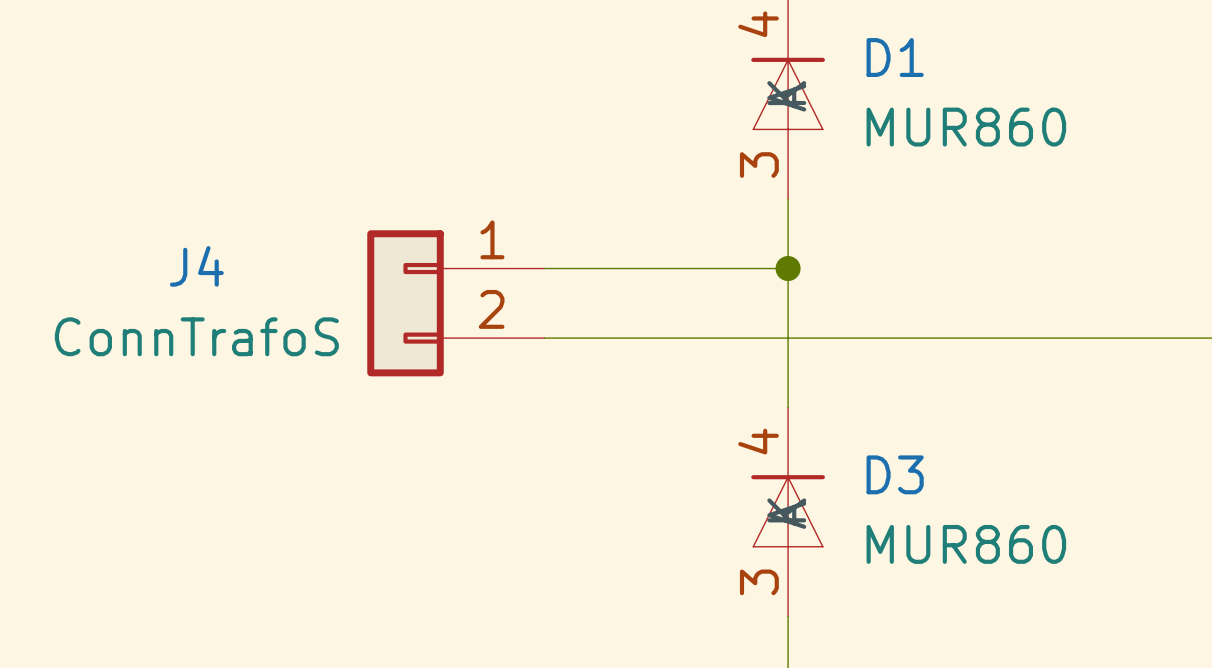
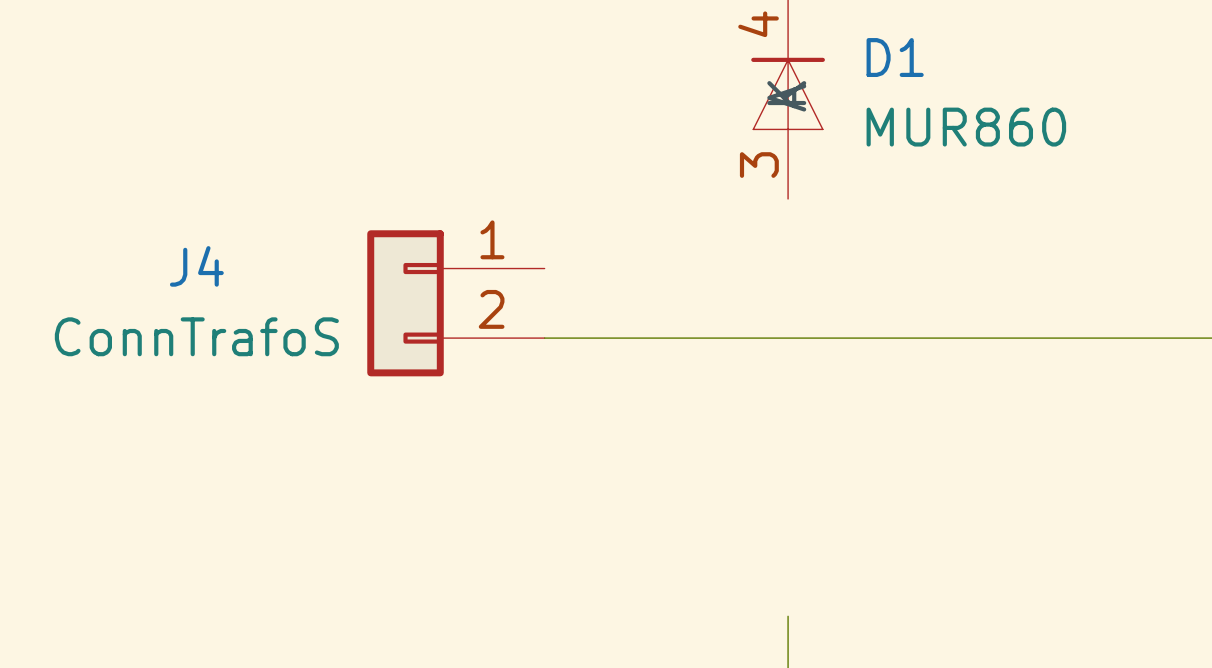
wire: (788, 198) (788, 407) -> none
wire: (544, 268) (788, 268) -> none
junction: (788, 268) -> none
D3: MUR860 (788, 511) -> none

